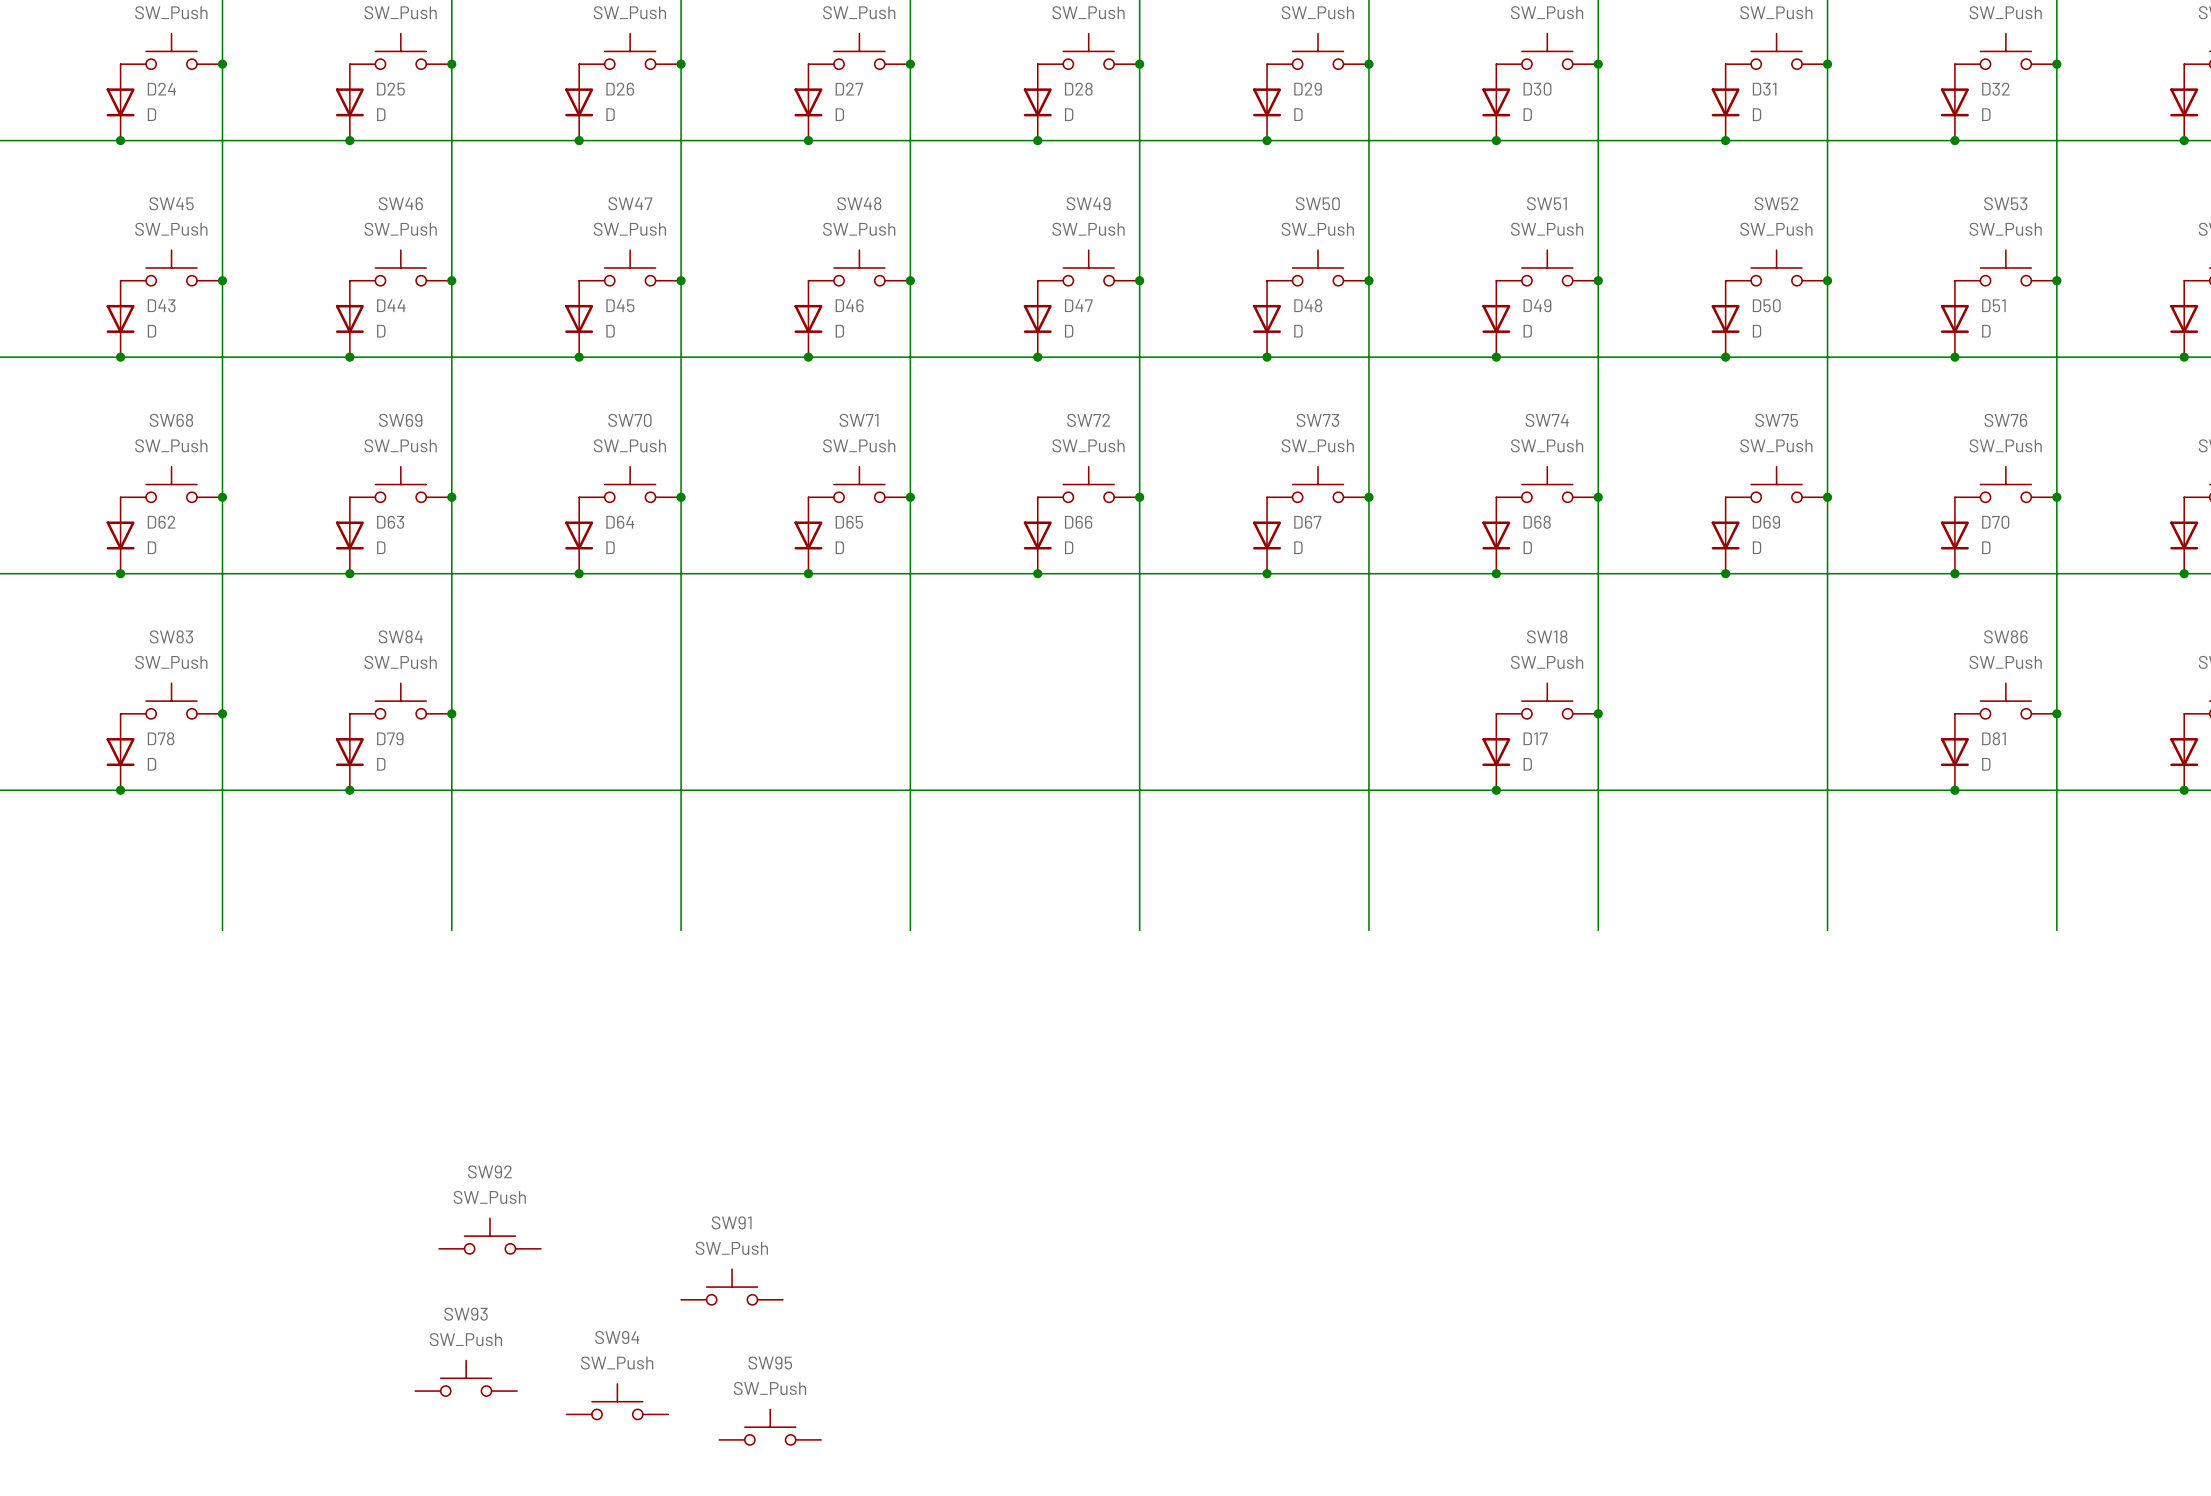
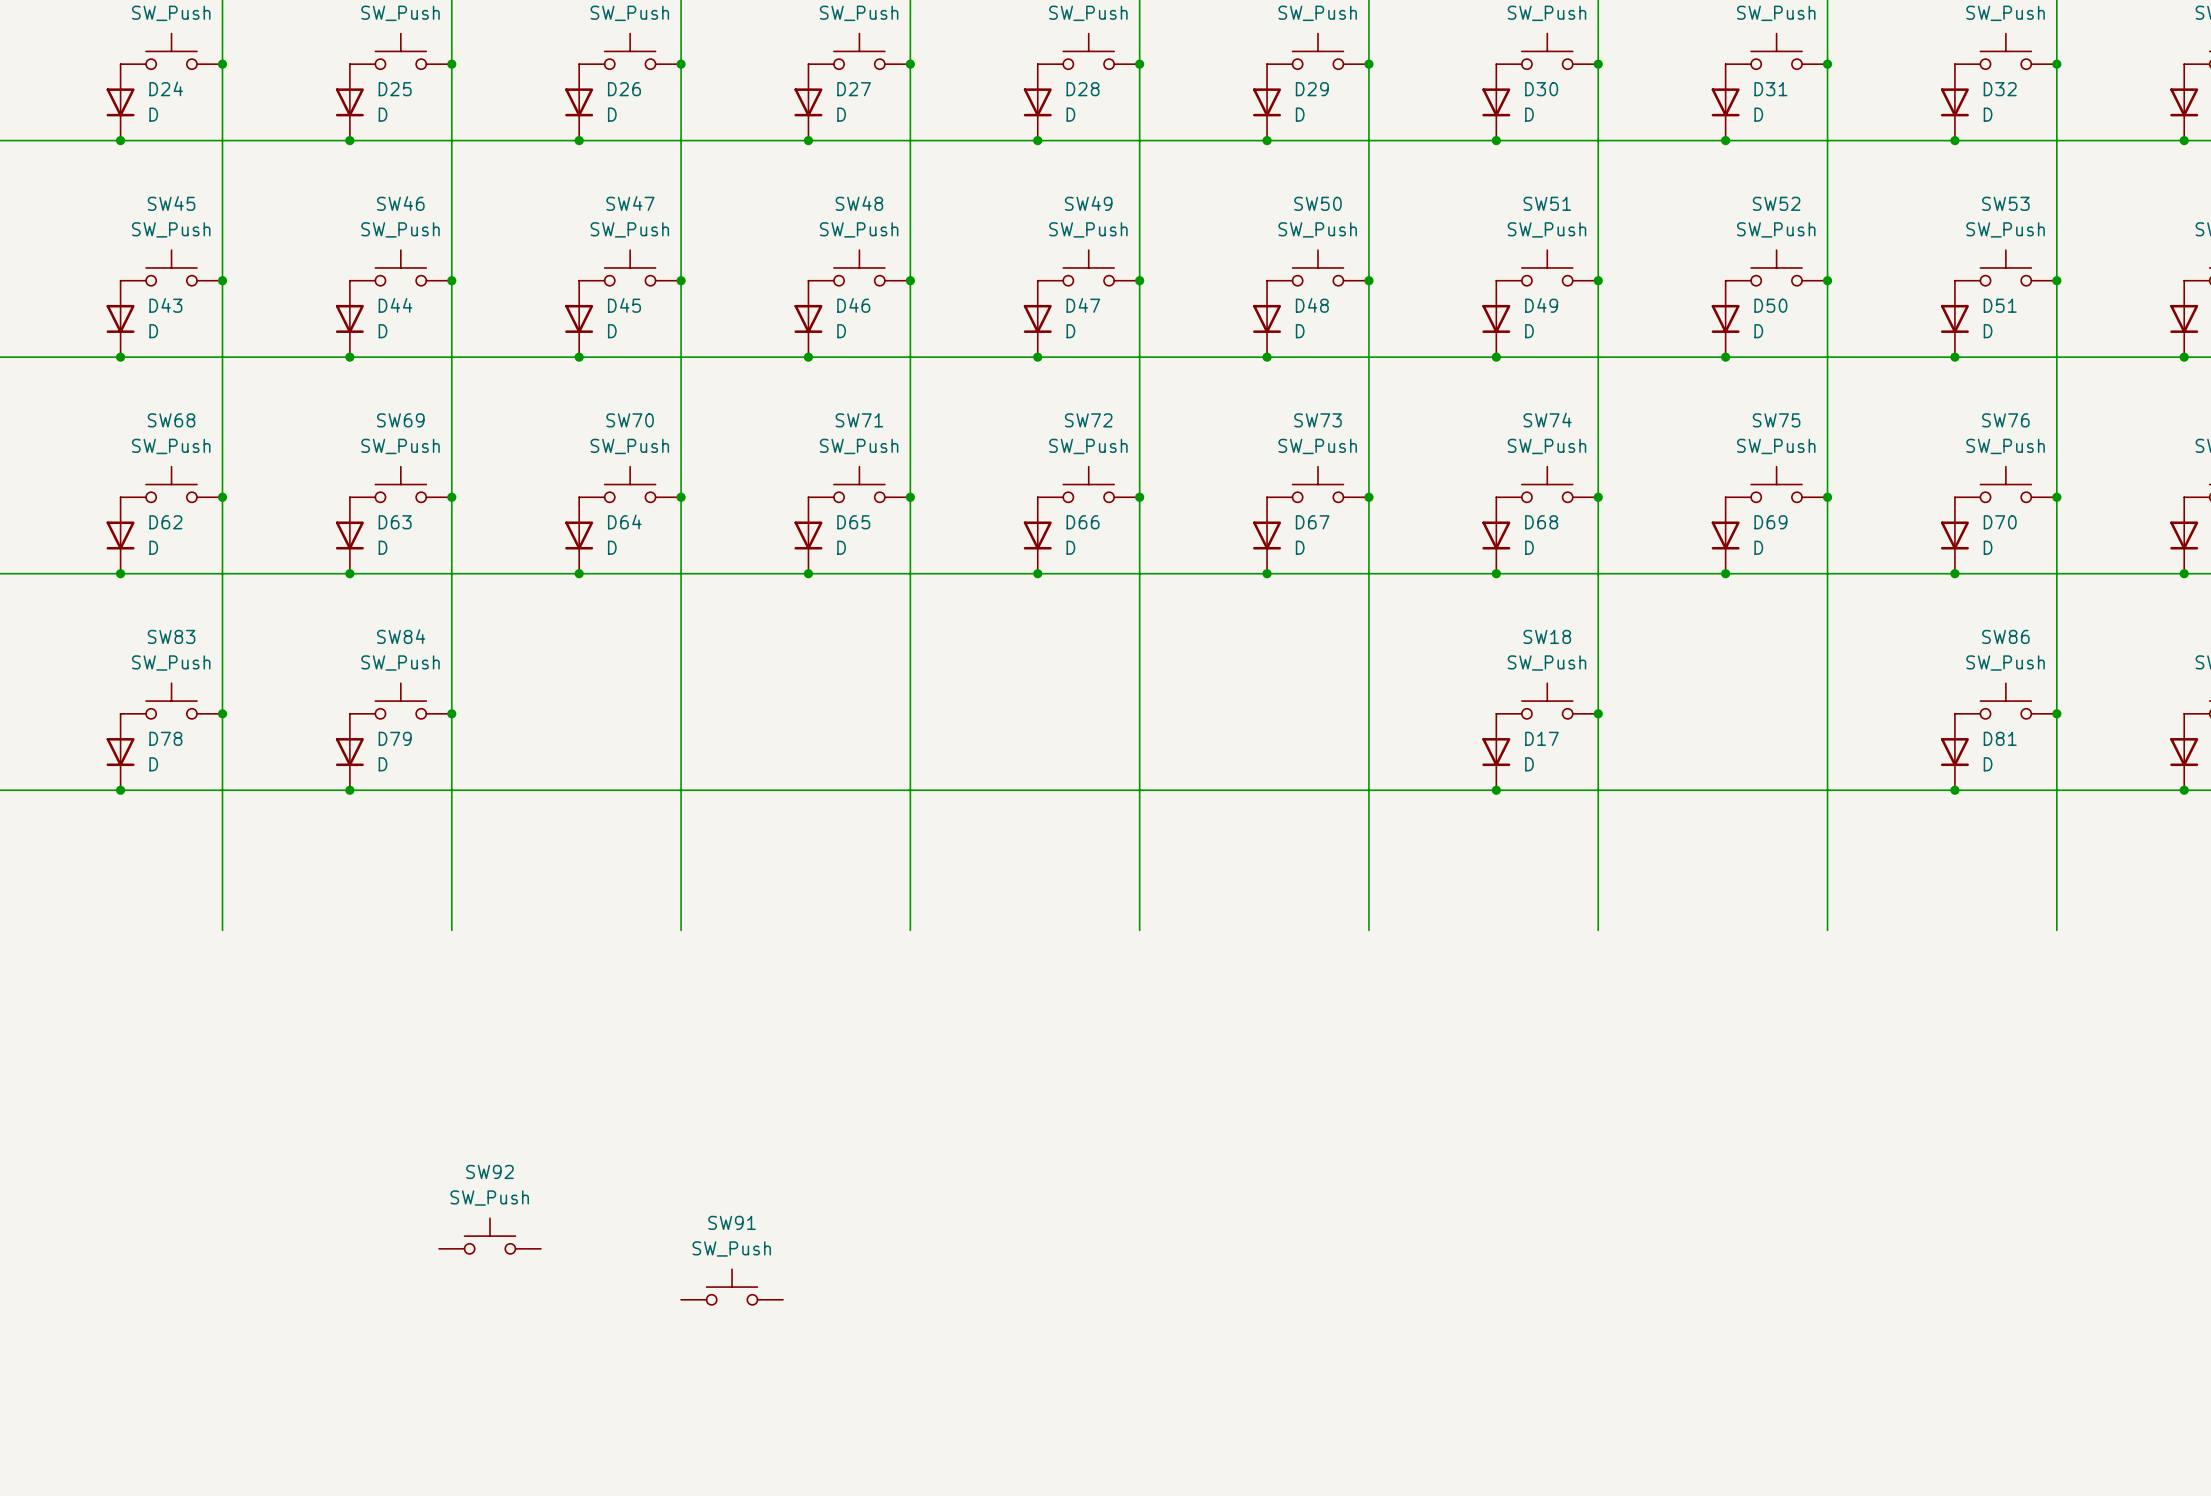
SW93: SW_Push (466, 1378) -> none
SW94: SW_Push (617, 1401) -> none
SW95: SW_Push (770, 1427) -> none

